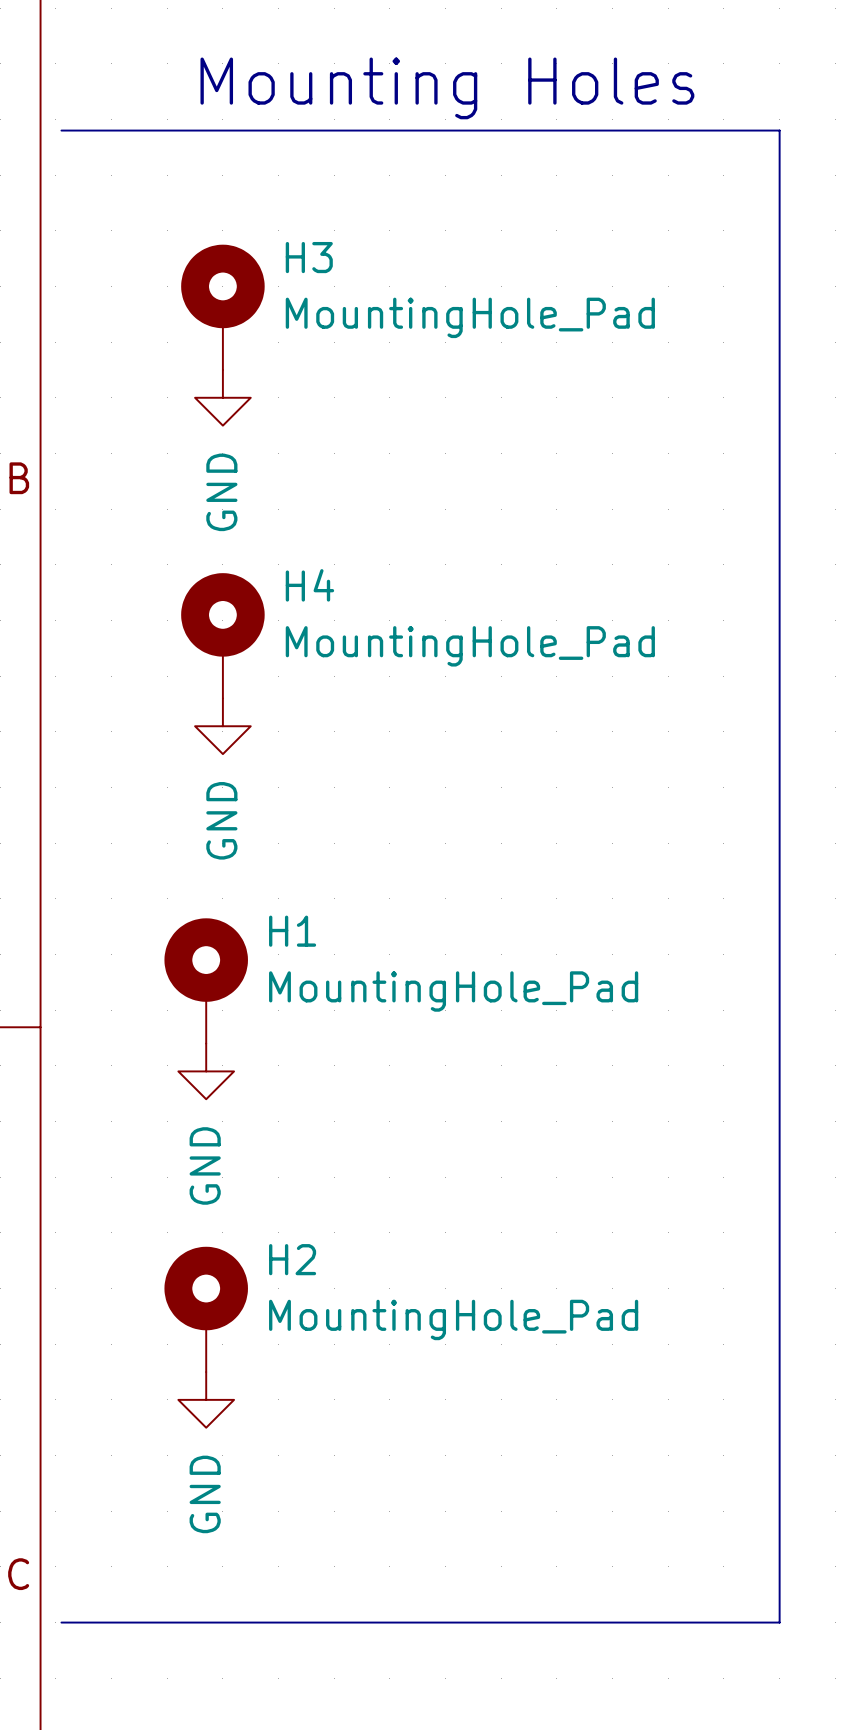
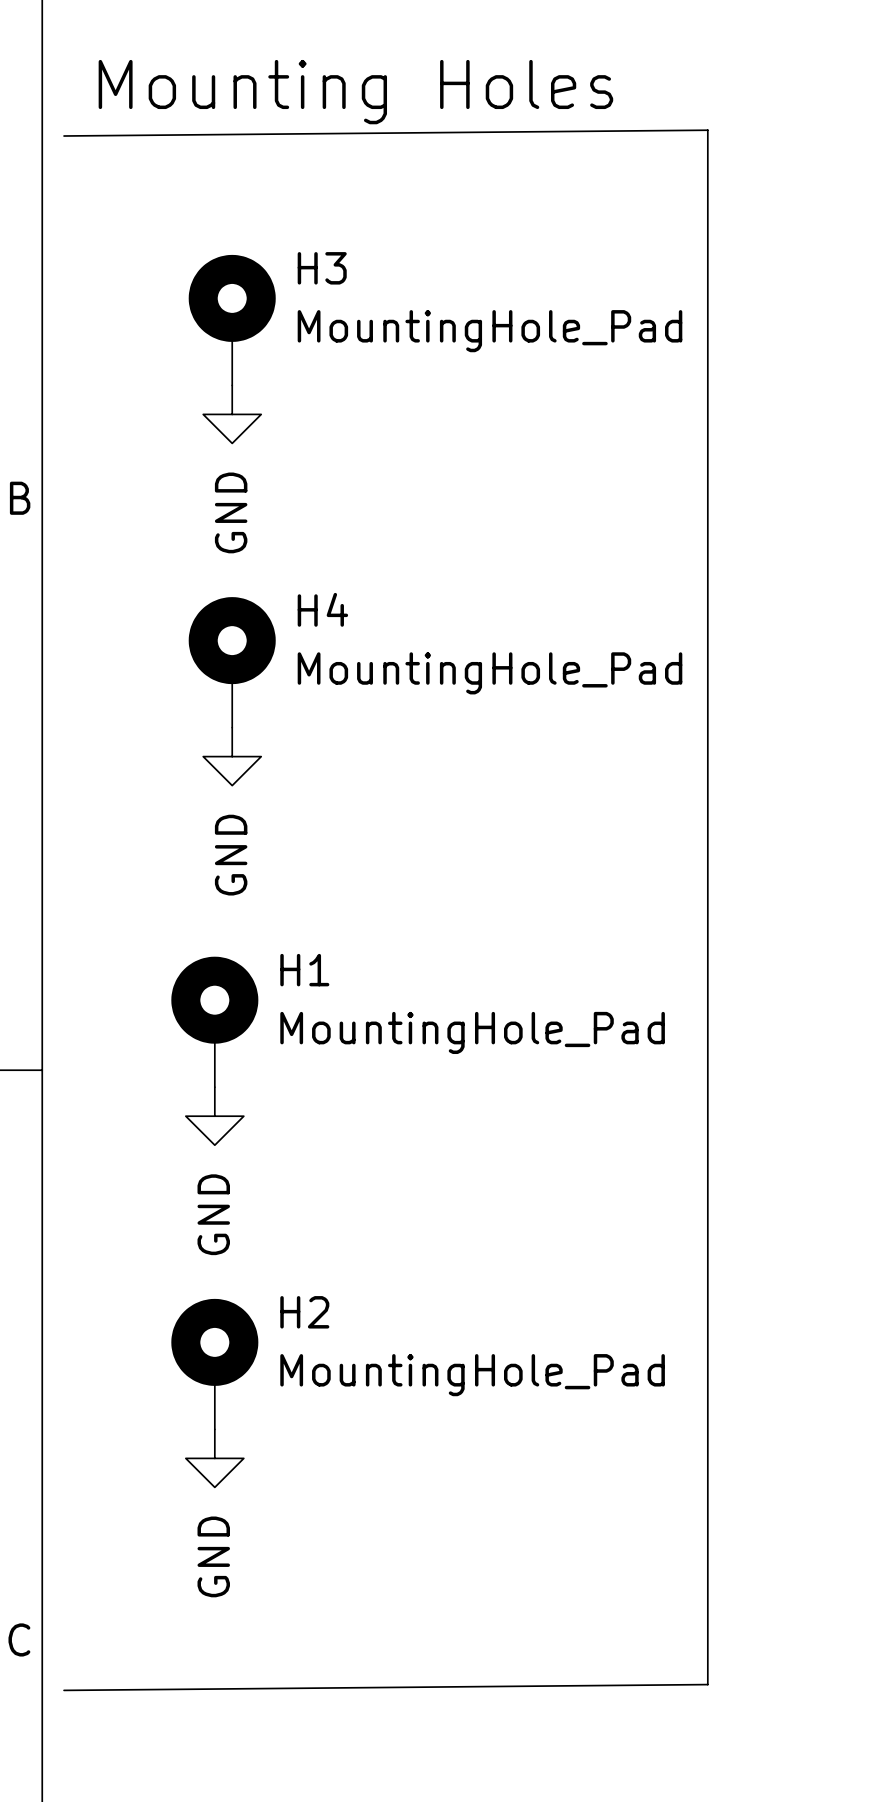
text position: Mounting Holes (447, 88) -> Mounting Holes (355, 92)
line: (61, 130) (779, 130) (779, 1622) (61, 1622) -> (64, 136) (707, 130) (707, 1684) (64, 1690)

